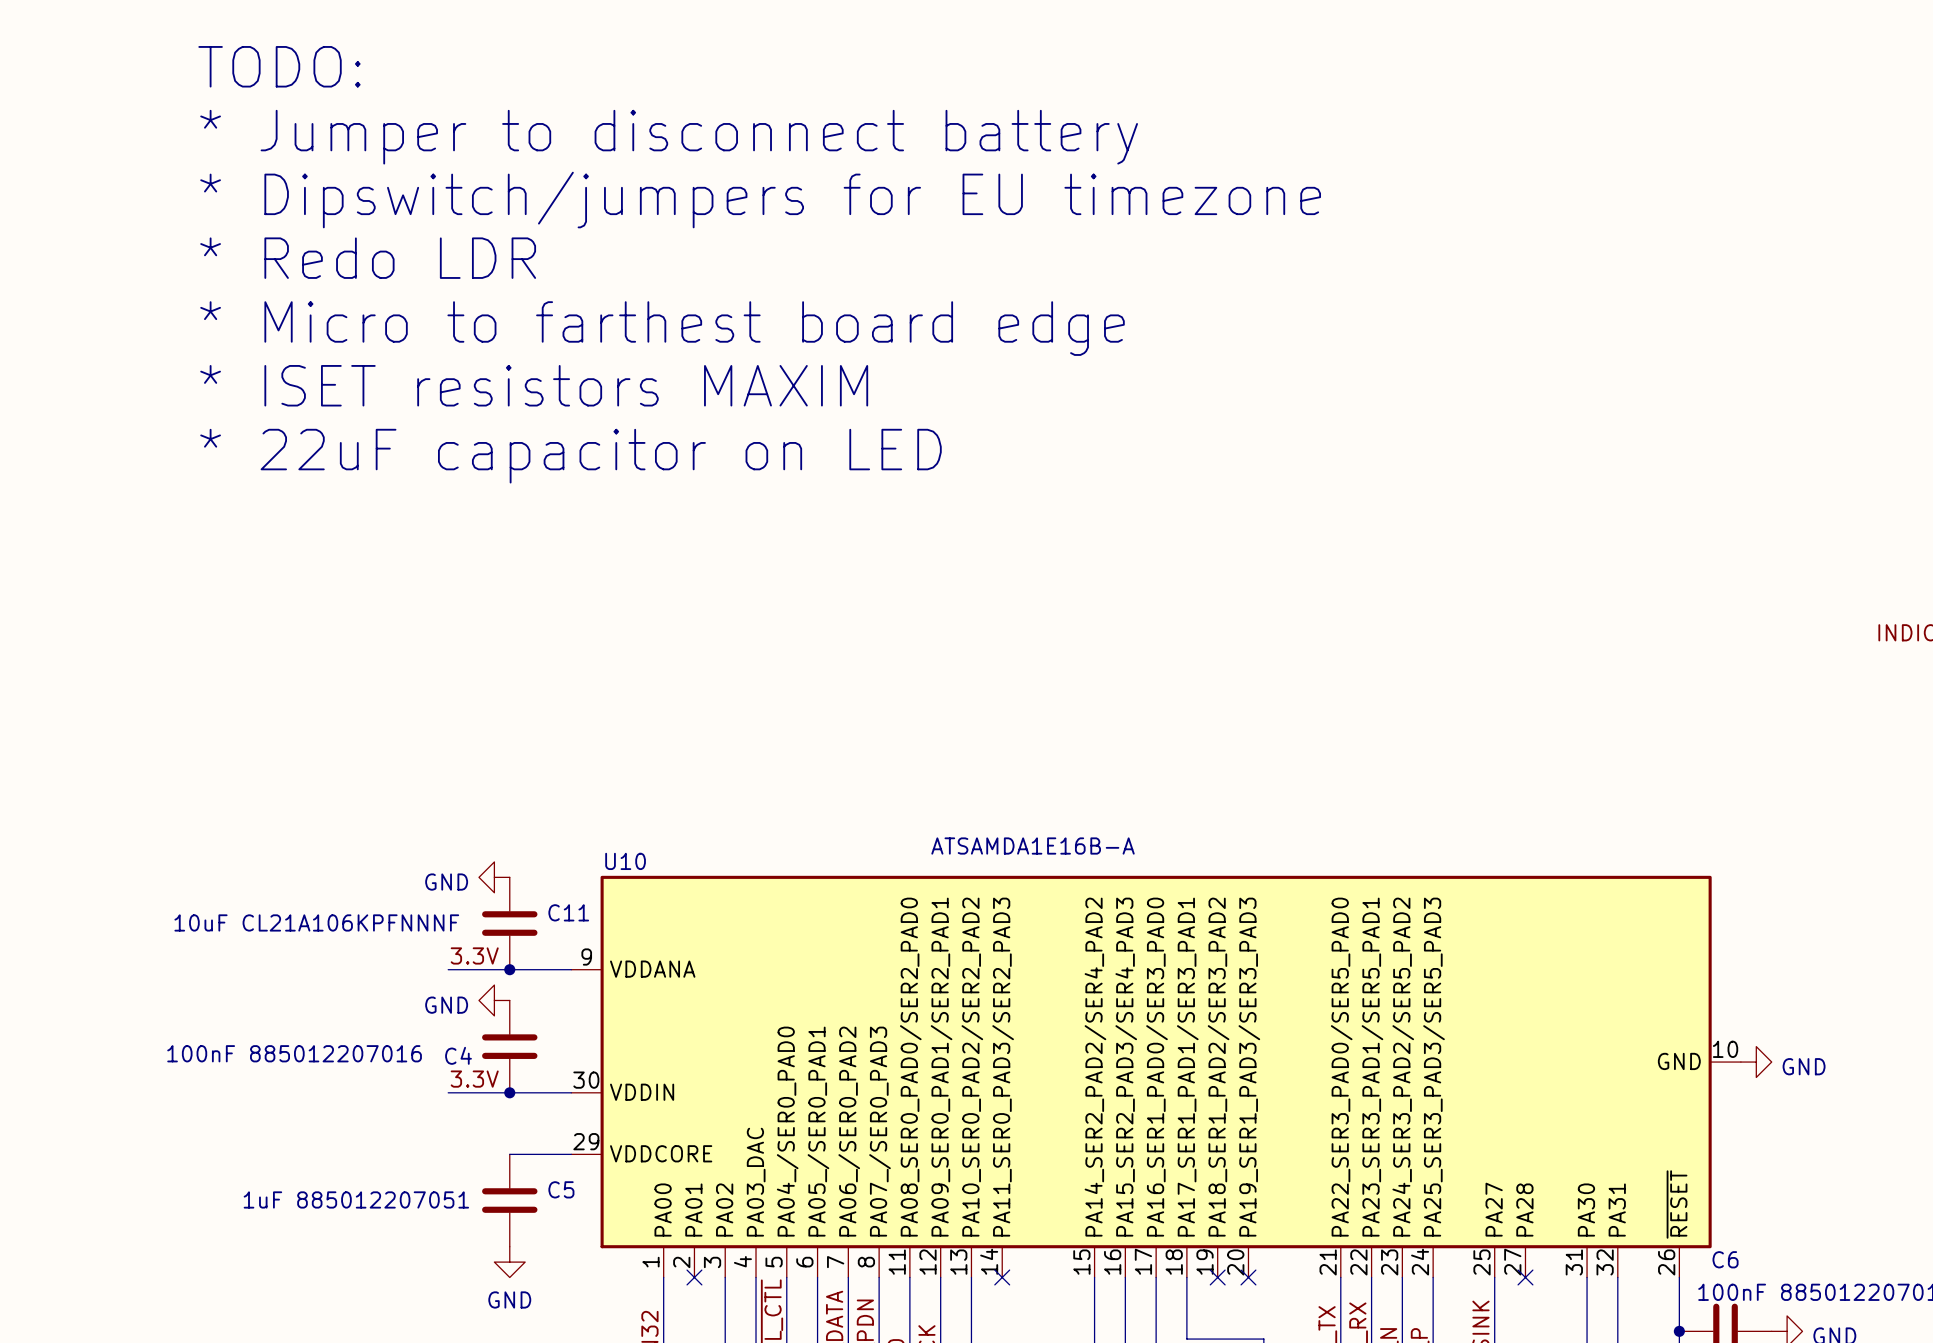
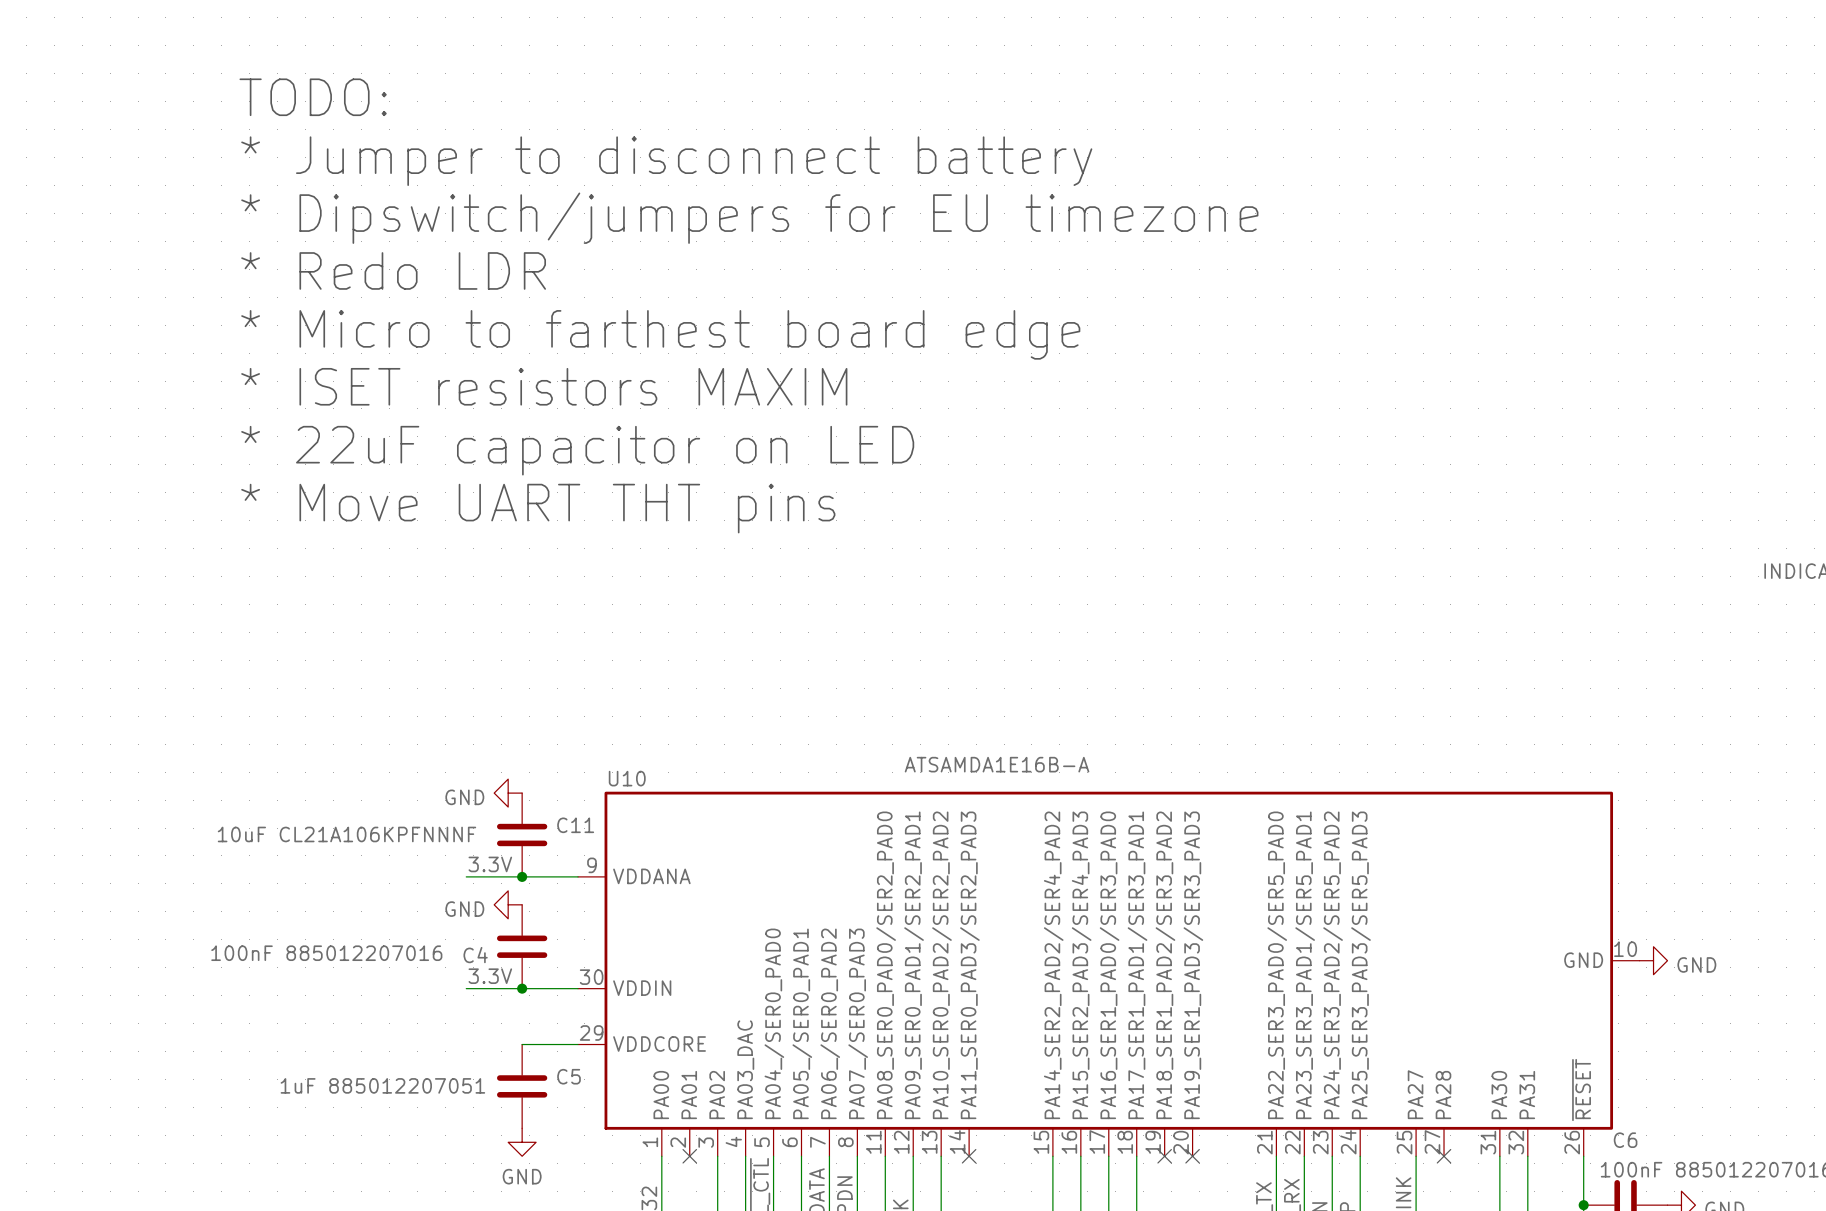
text position: TODO: (279, 66) -> TODO: (313, 97)
text position: * Jumper to disconnect battery (669, 137) -> * Jumper to disconnect battery (666, 161)
text position: * Dipswitch/jumpers for EU timezone (760, 200) -> * Dipswitch/jumpers for EU timezone (749, 218)
text position: * Redo LDR (368, 258) -> * Redo LDR (393, 270)
text position: * Micro to farthest board edge (662, 328) -> * Micro to farthest board edge (660, 334)
text position: * ISET resistors MAXIM (534, 385) -> * ISET resistors MAXIM (544, 386)
text position: * 22uF capacitor on LED (570, 456) -> * 22uF capacitor on LED (577, 450)
text: none -> * Move UART THT pins (538, 508)

